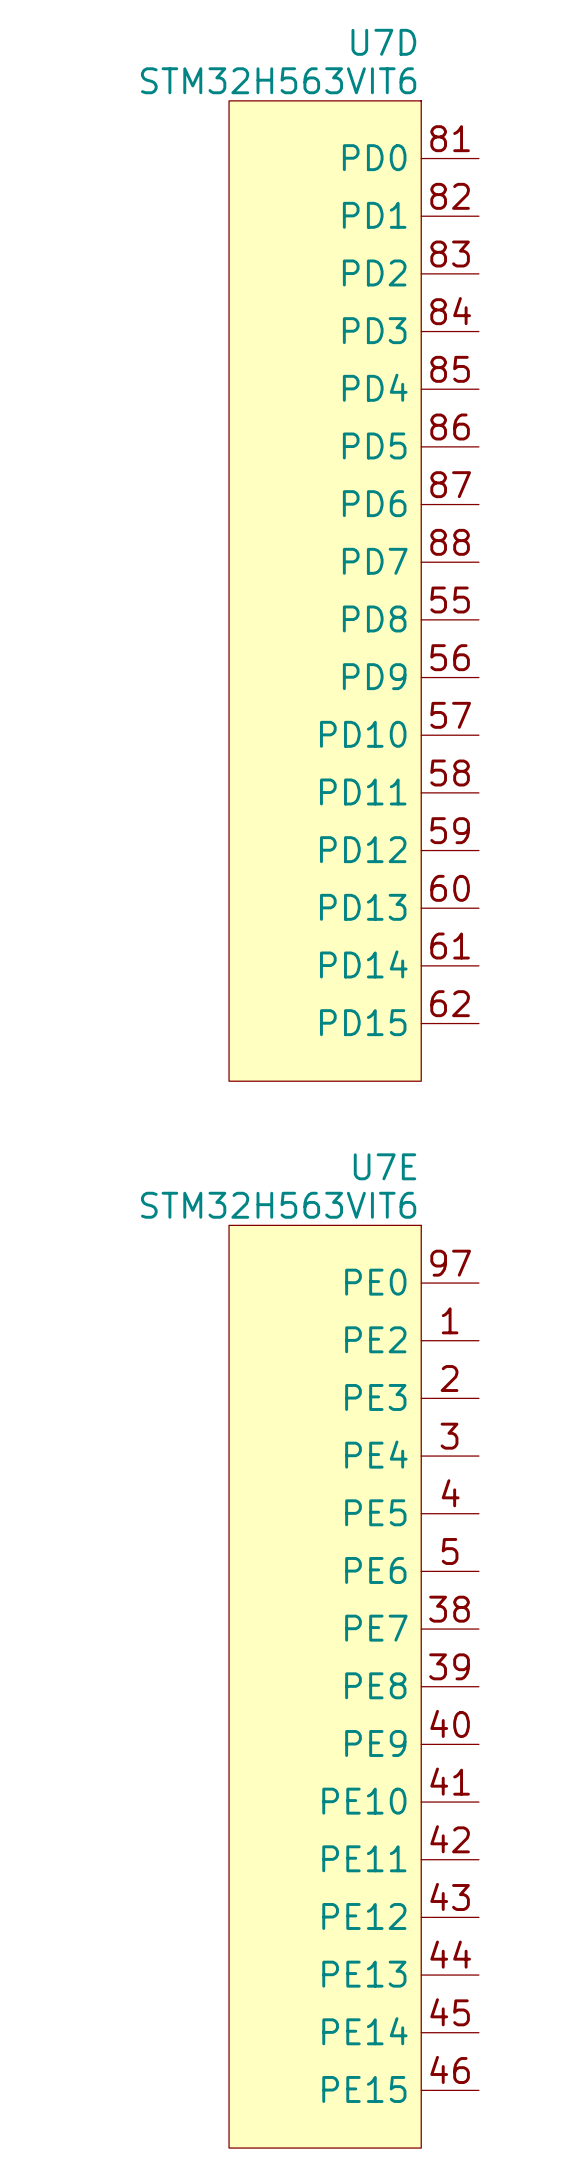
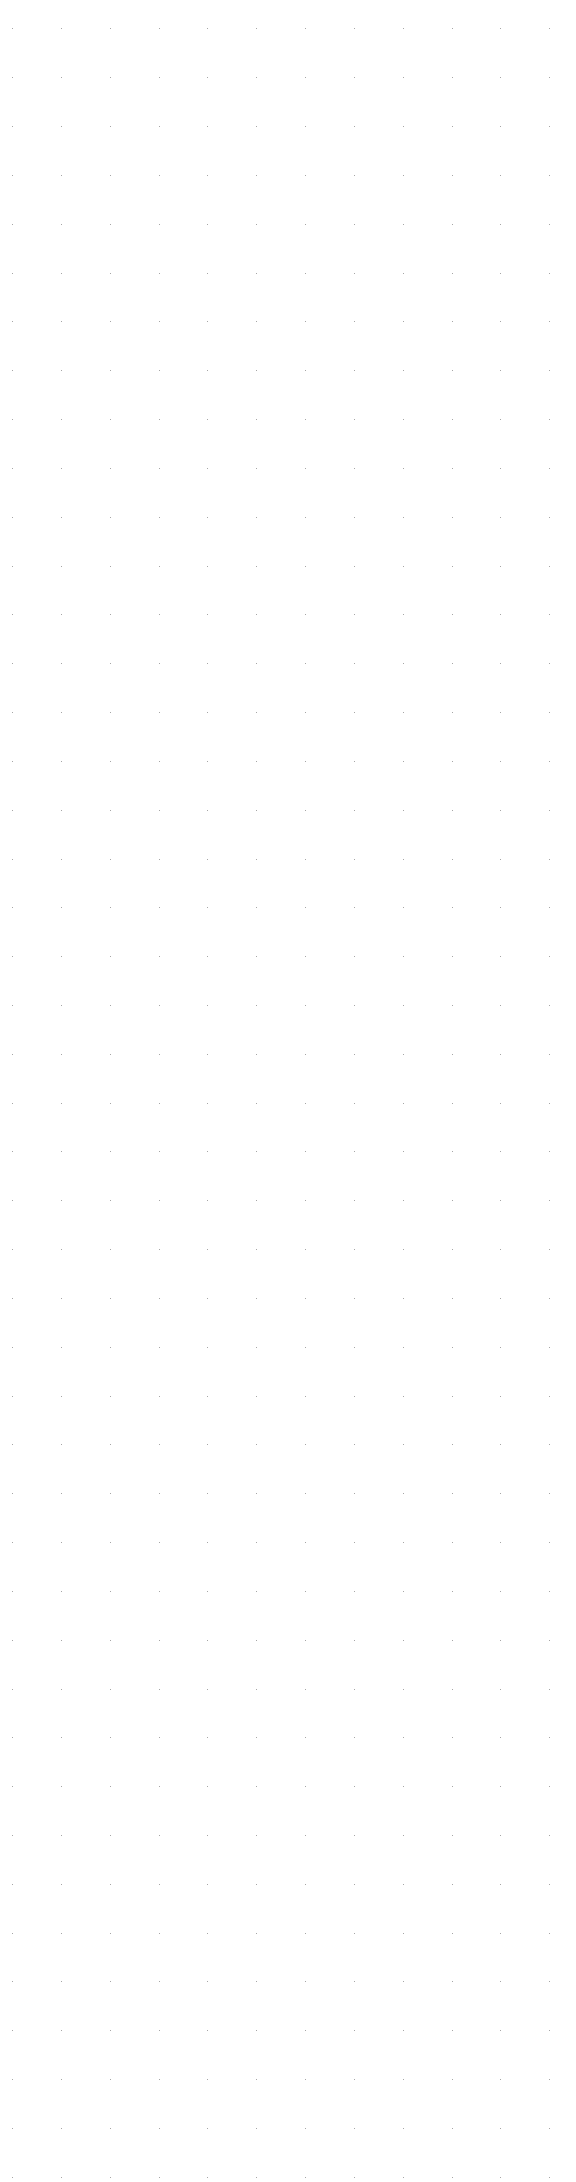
U7D: (353, 591) -> none
U7E: (353, 1686) -> none

